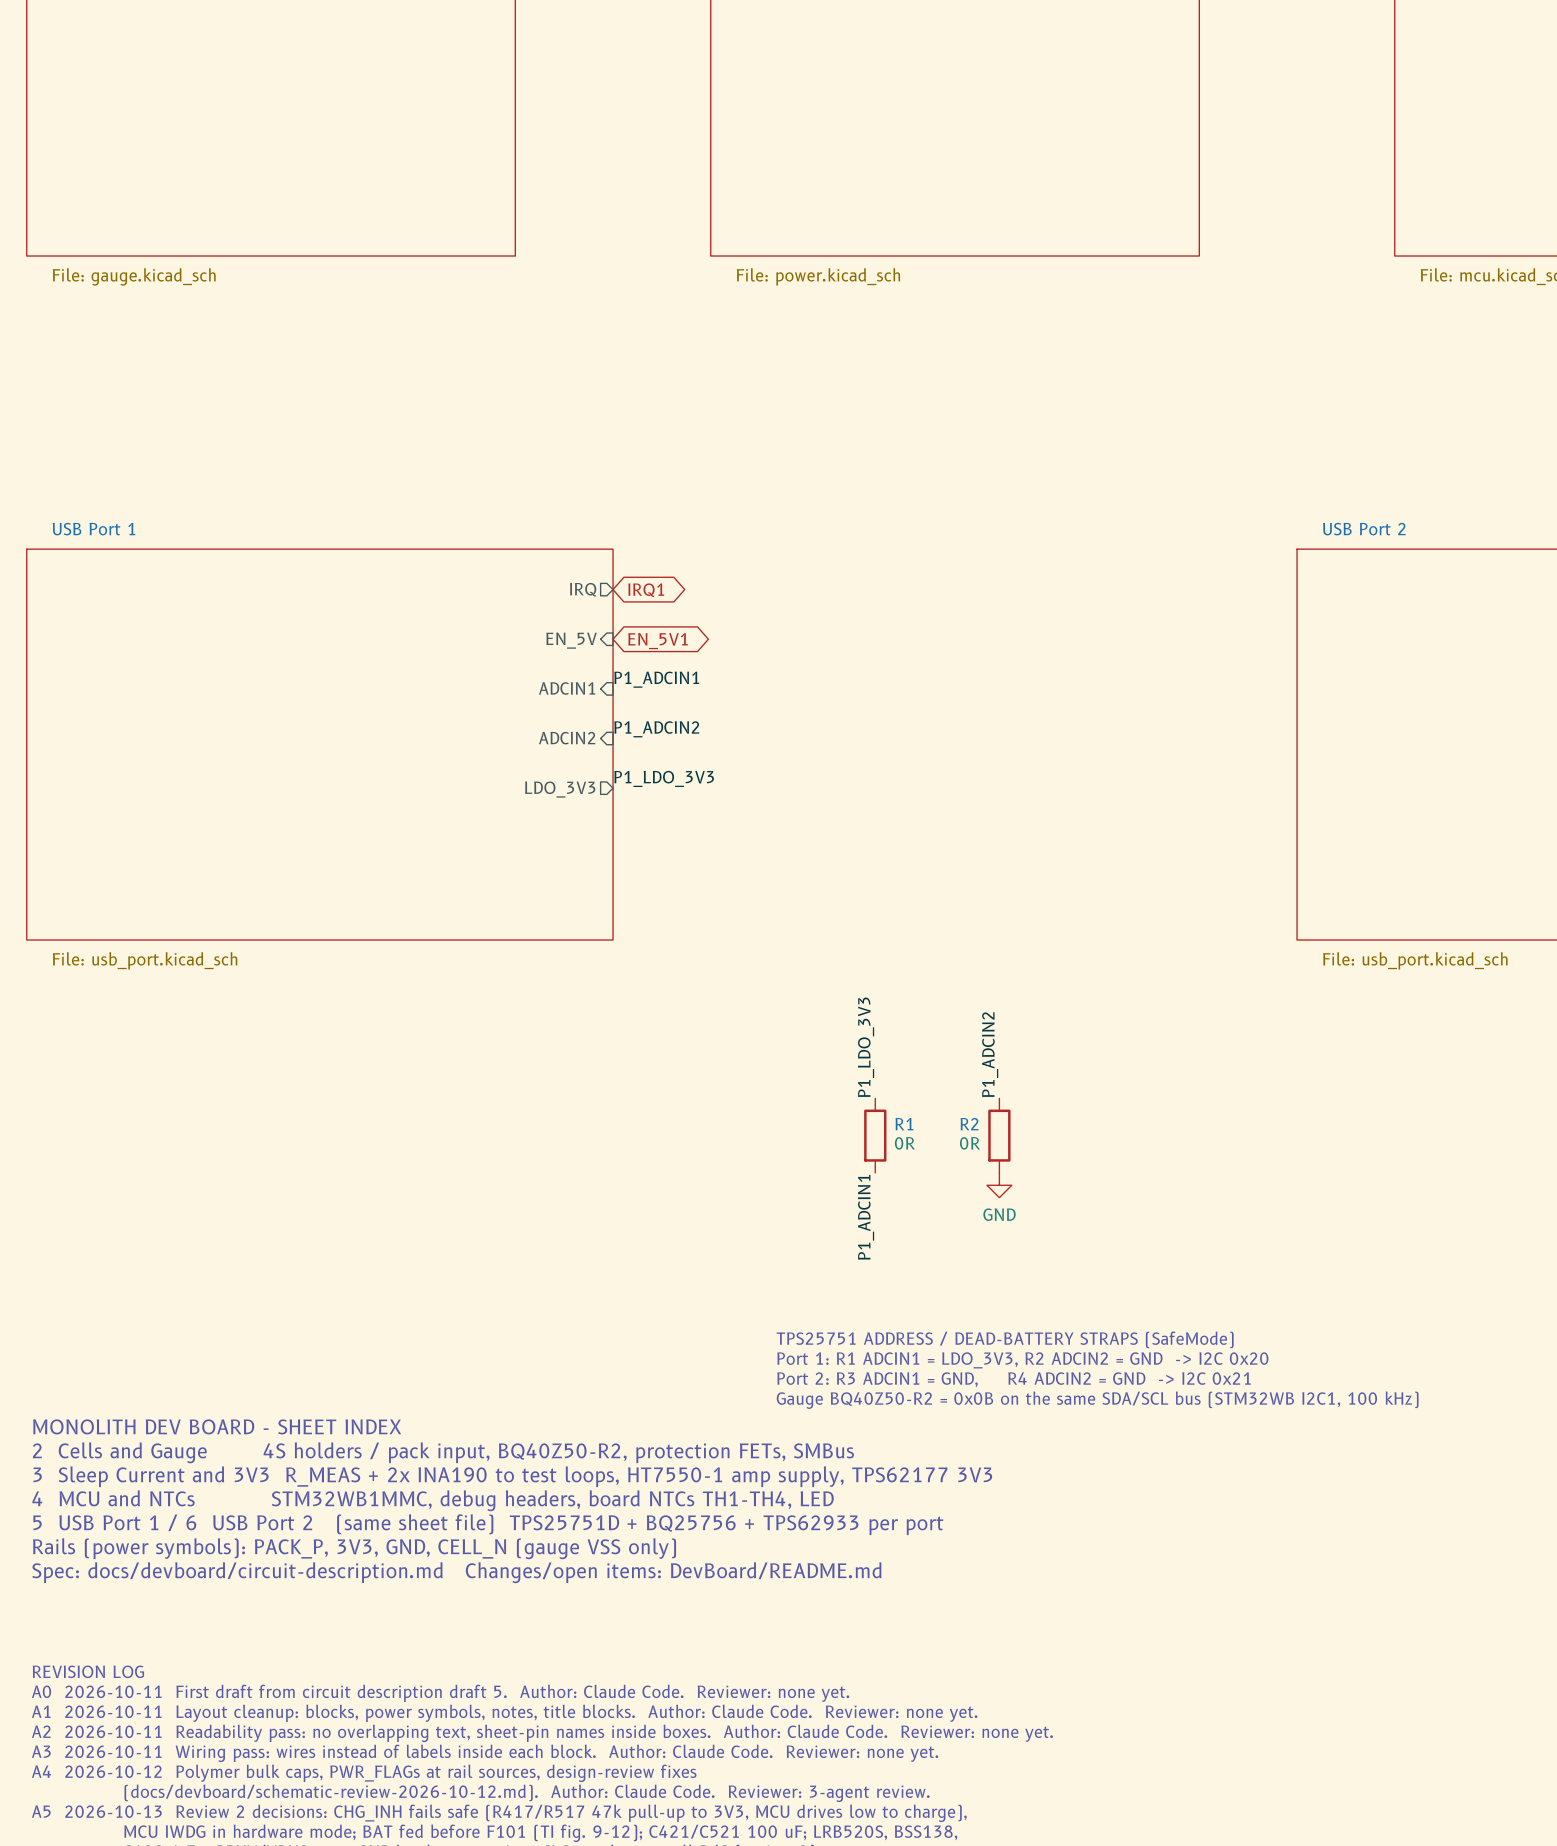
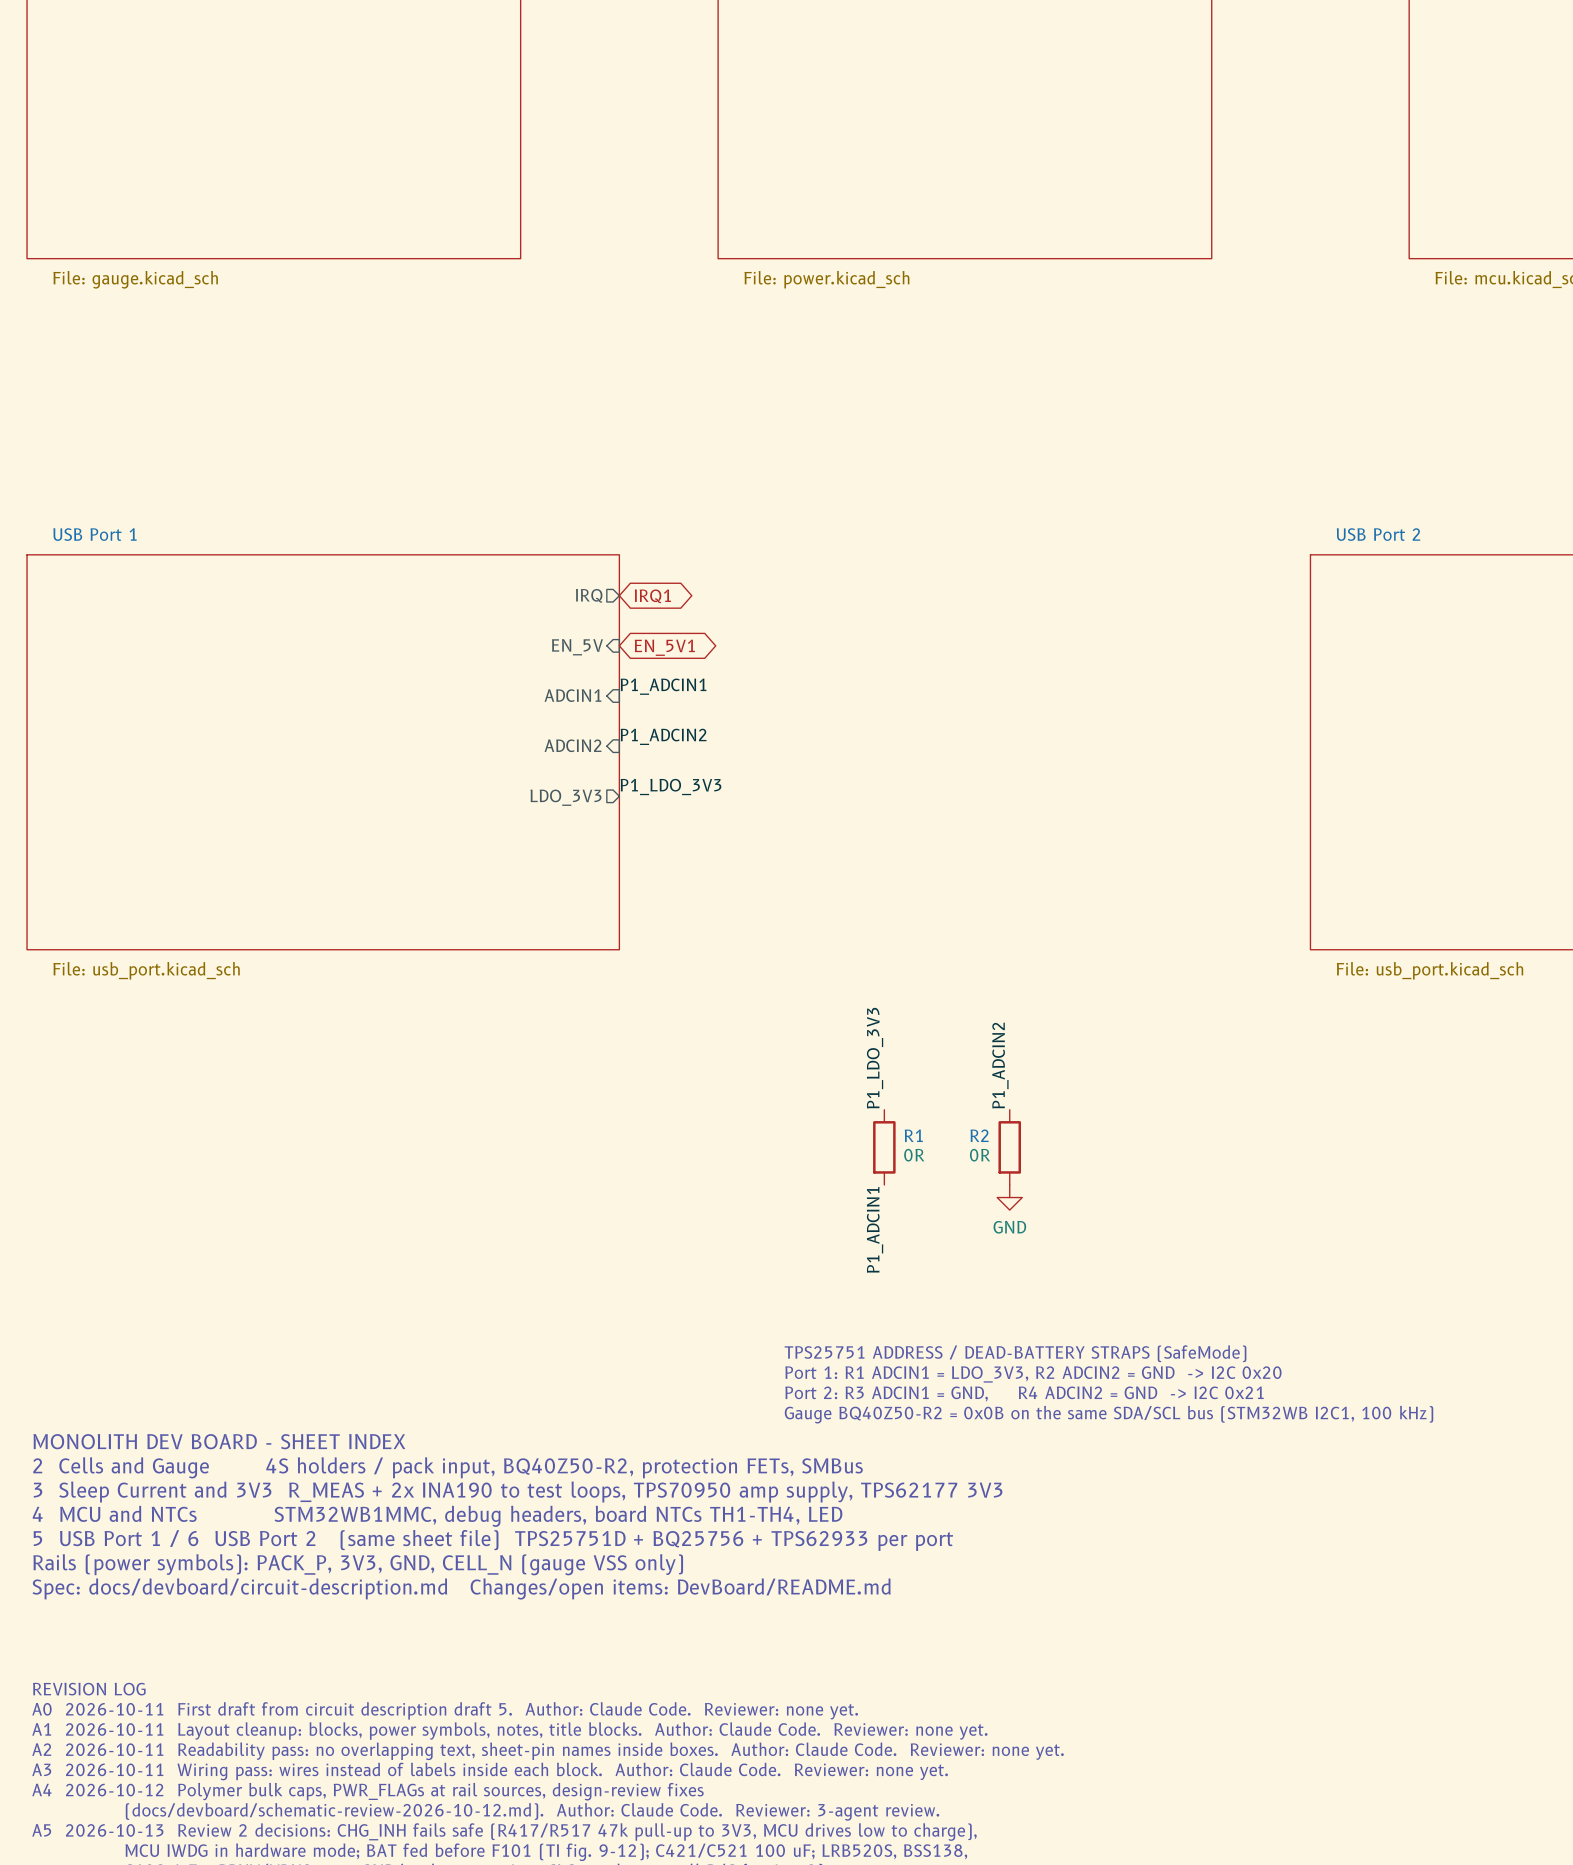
text: 3 Sleep Current and 3V3 R_MEAS + 2x INA190 to test loops, HT7550-1 amp supply, TPS62177 3V3 (512, 1476) -> 3 Sleep Current and 3V3 R_MEAS + 2x INA190 to test loops, TPS70950 amp supply, TPS62177 3V3 (518, 1492)

